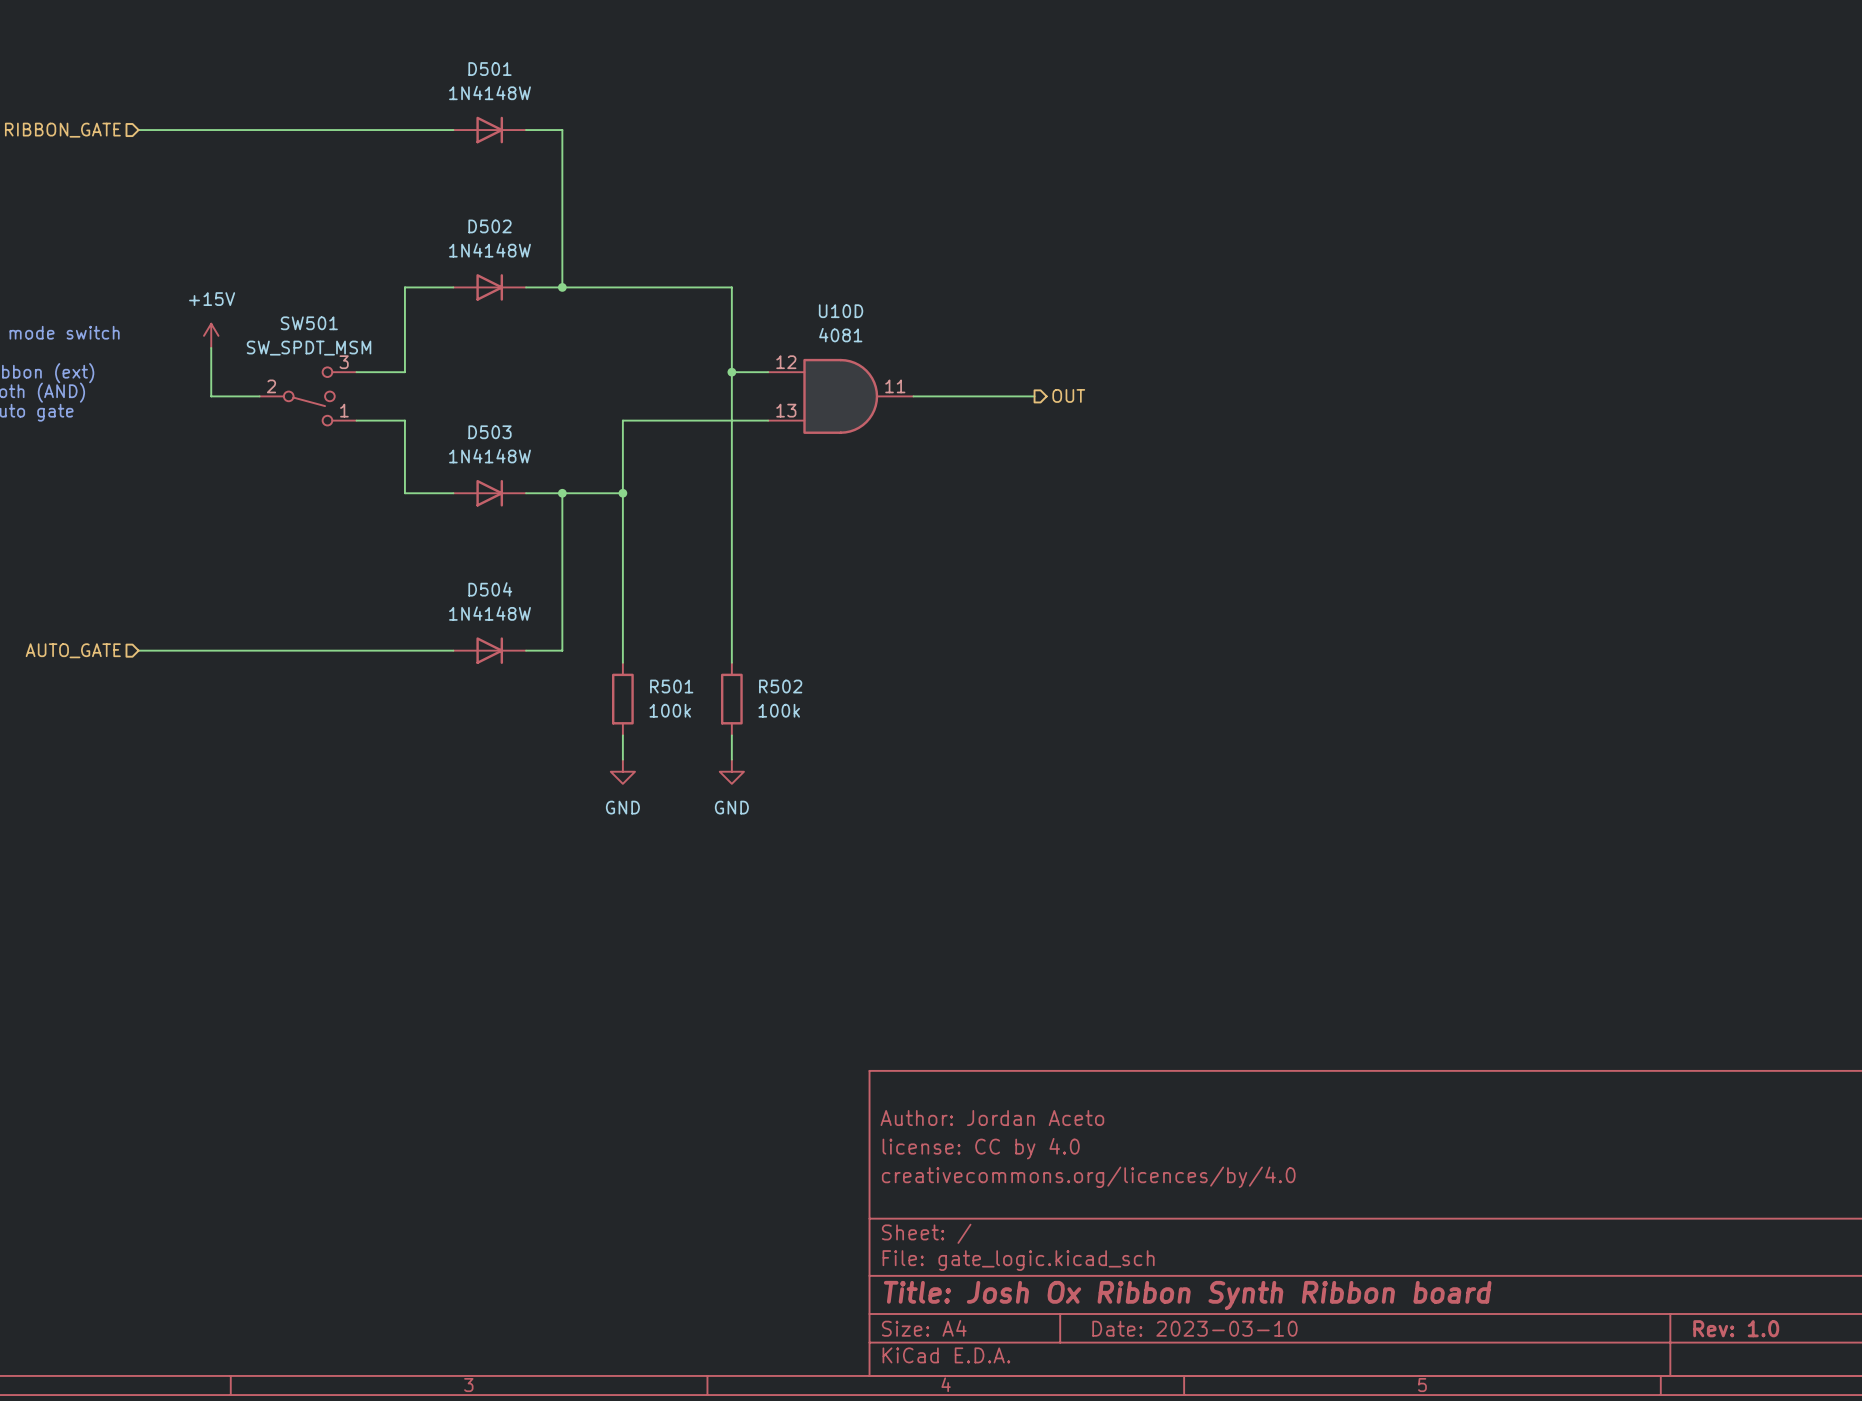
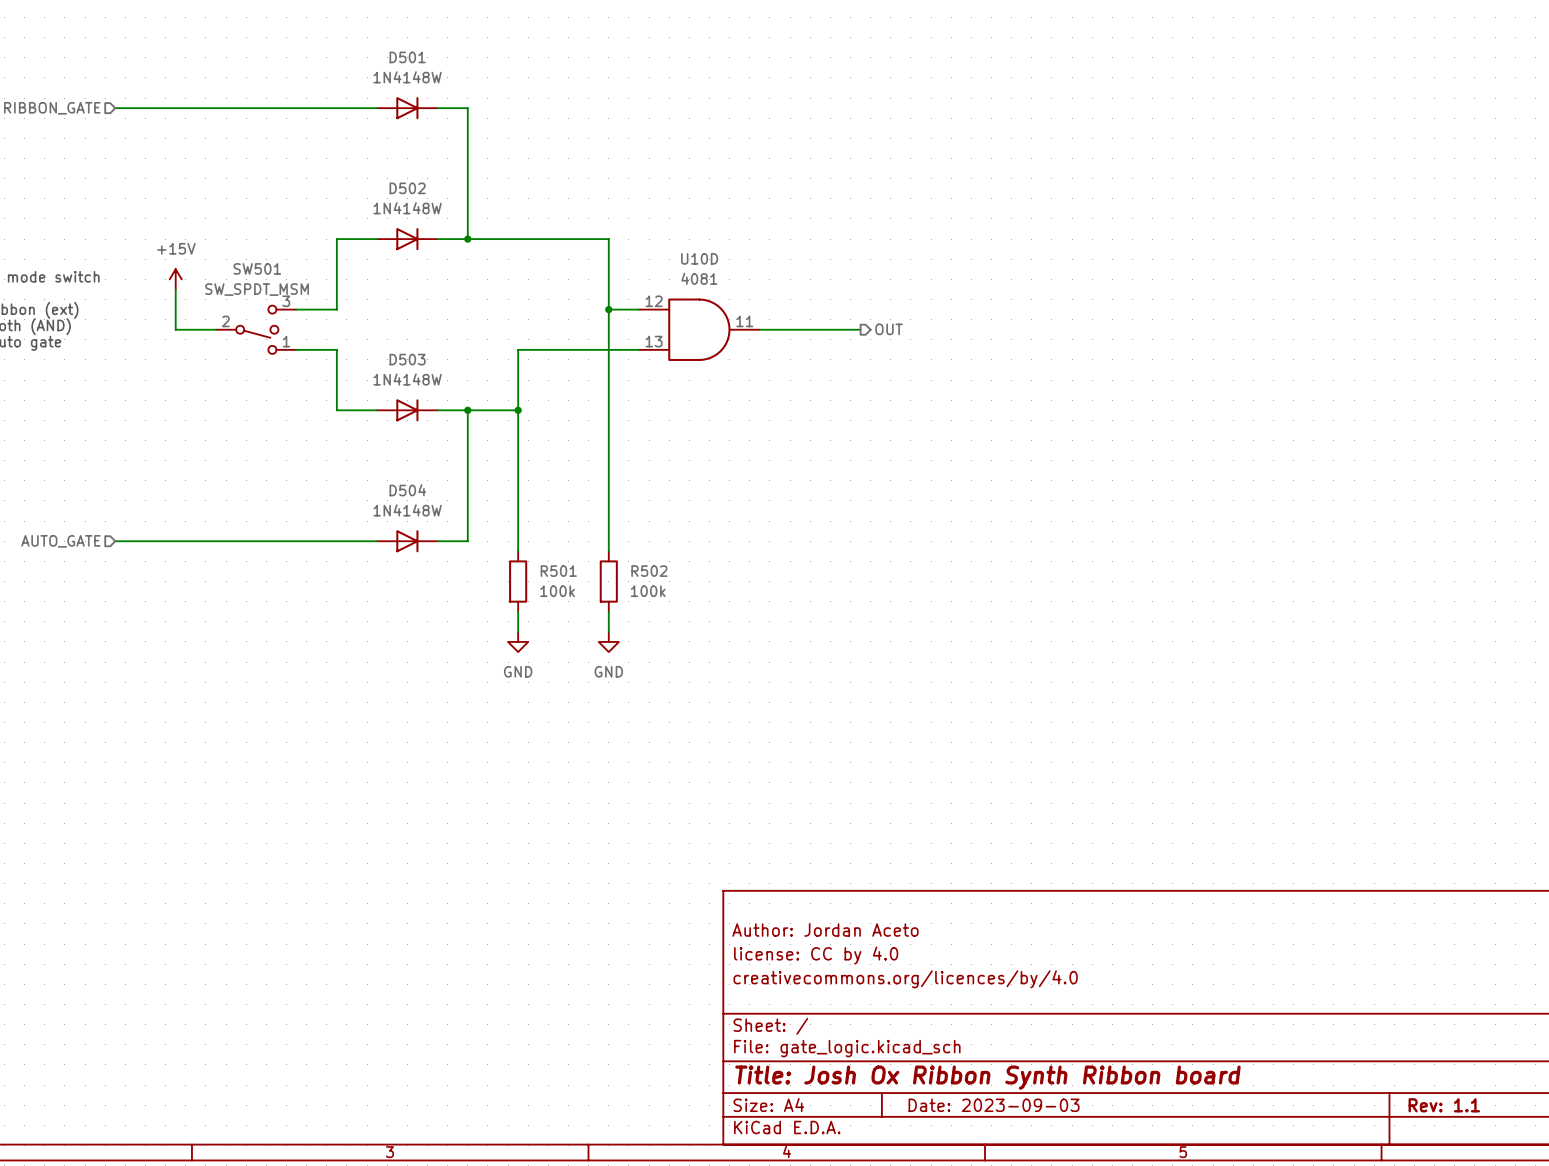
title block: Date: 2023-03-10 (1194, 1328) -> Date: 2023-09-03 (994, 1105)
title block: Rev: 1.0 (1736, 1328) -> Rev: 1.1 (1444, 1105)

